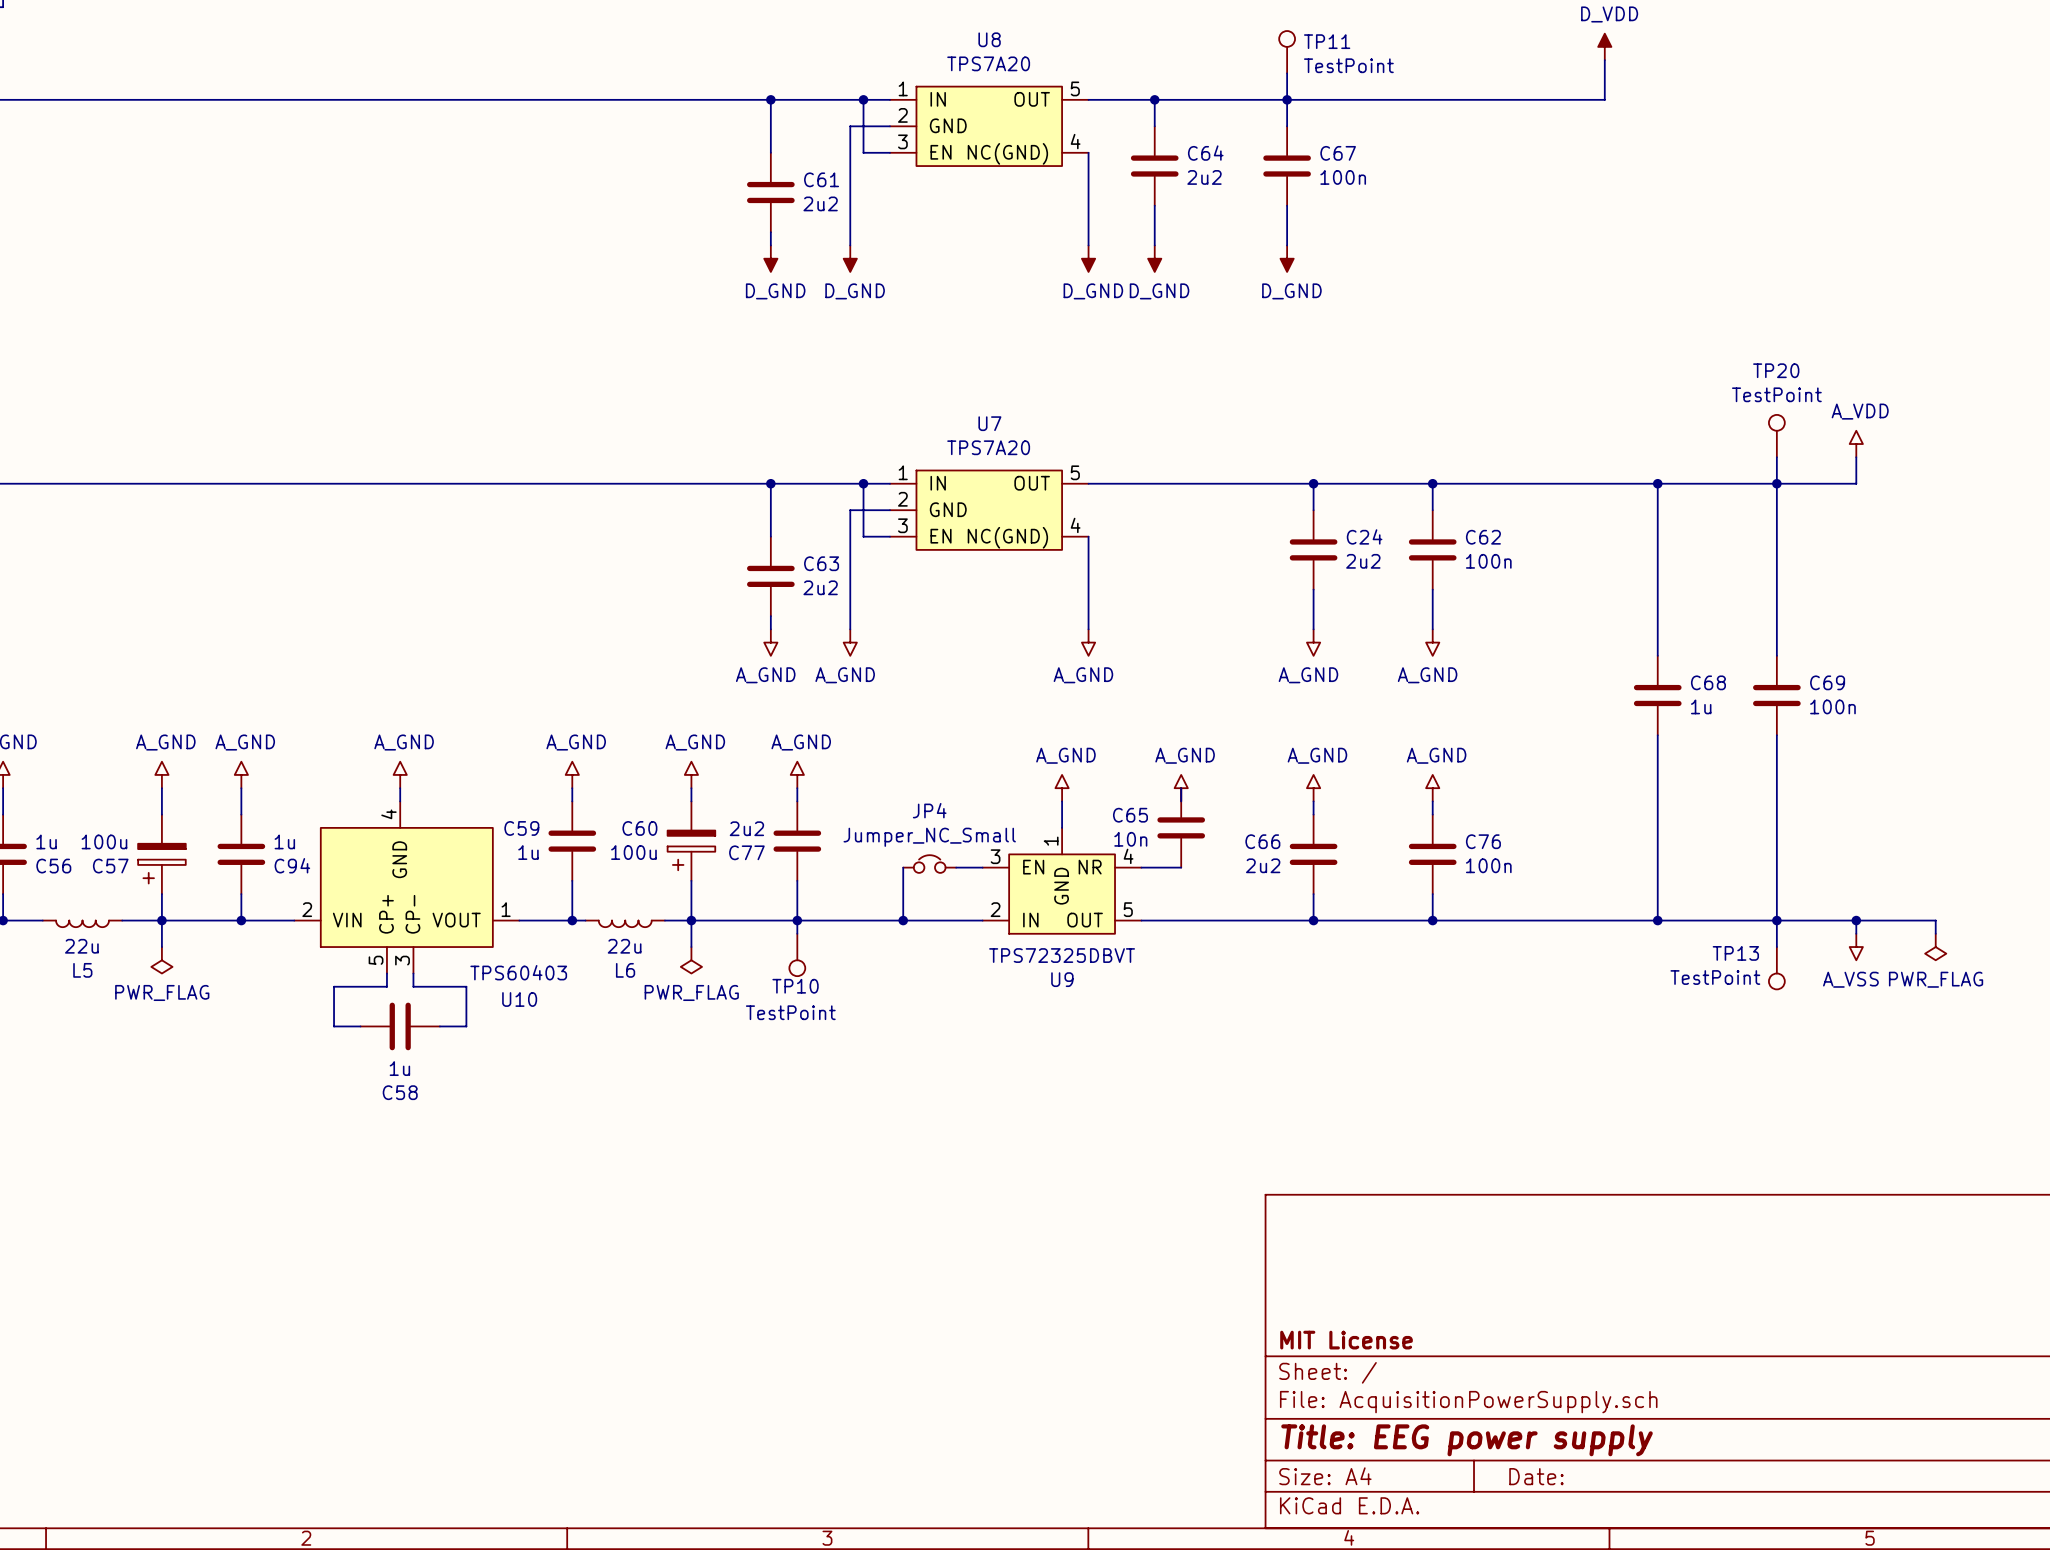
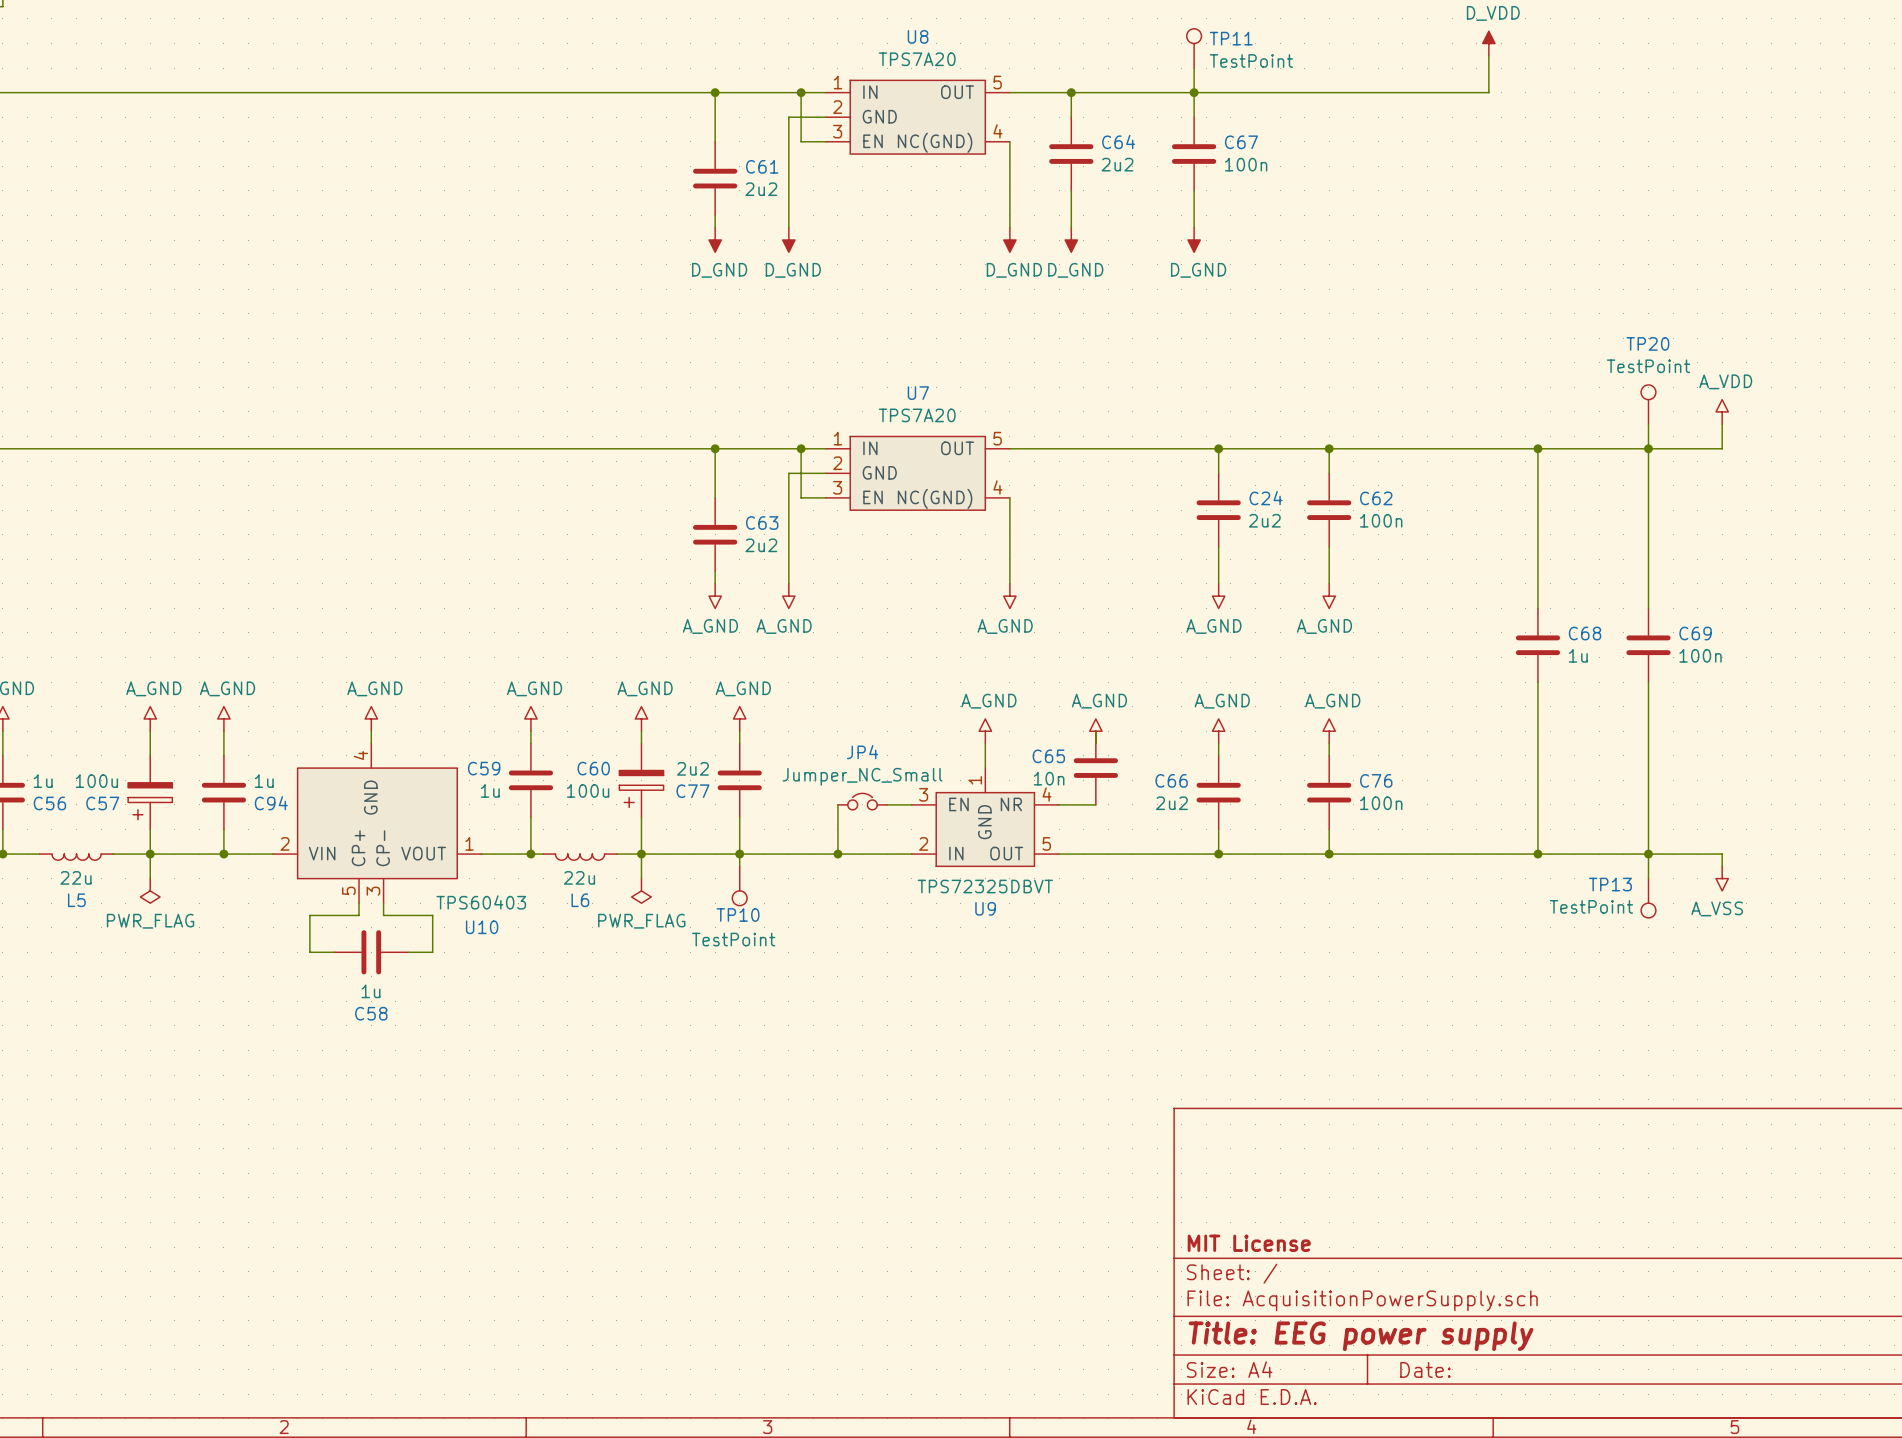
wire: (1856, 920) (1935, 920) (1935, 933) -> none
junction: (1856, 920) -> none
power symbol: PWR_FLAG (1935, 947) -> none

